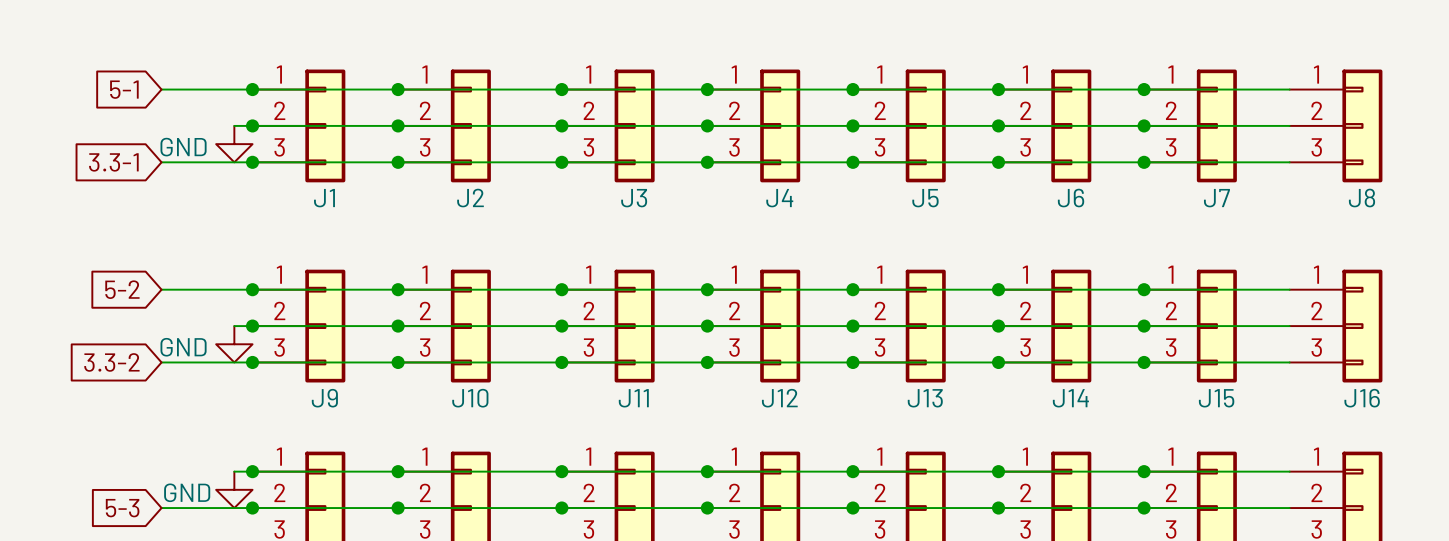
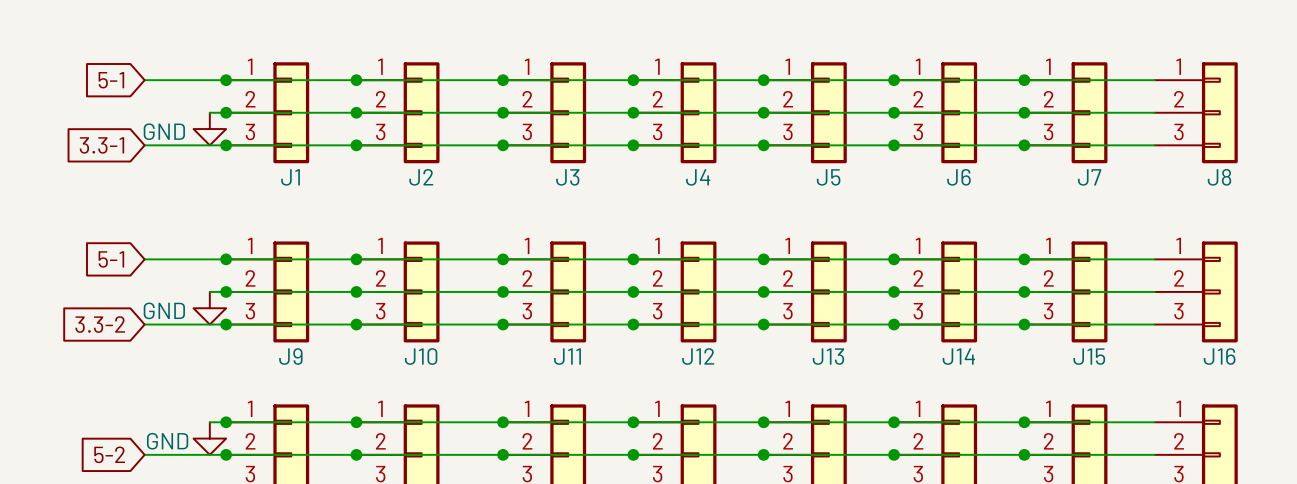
global label: 5-2 (122, 289) -> 5-1 (111, 259)
global label: 5-3 (122, 508) -> 5-2 (109, 454)

